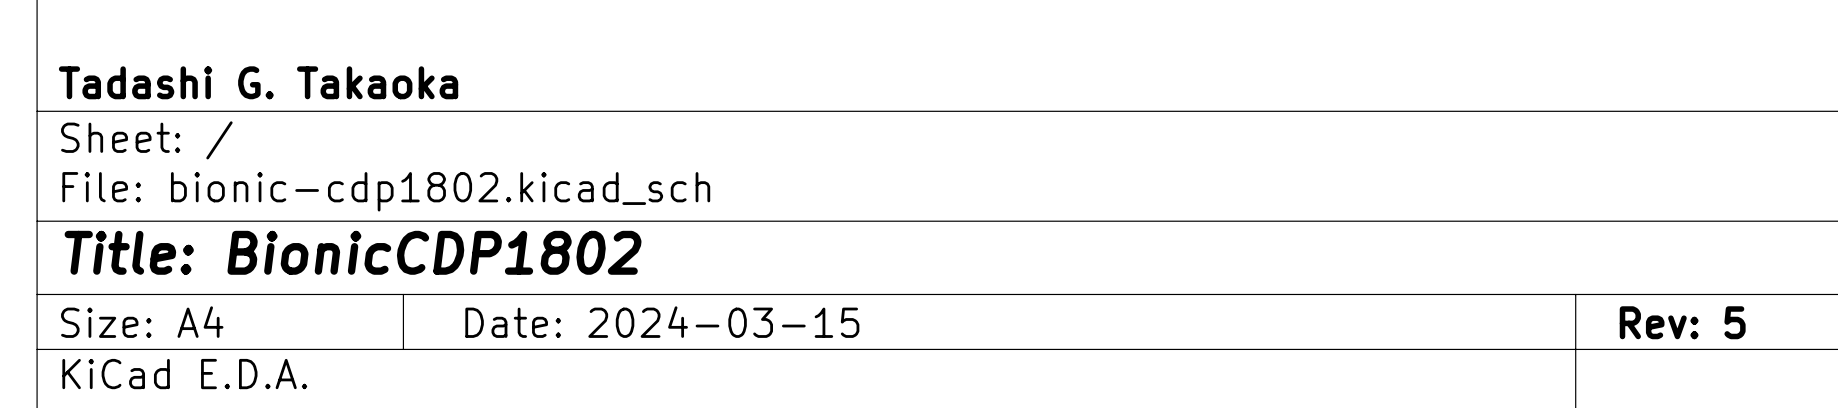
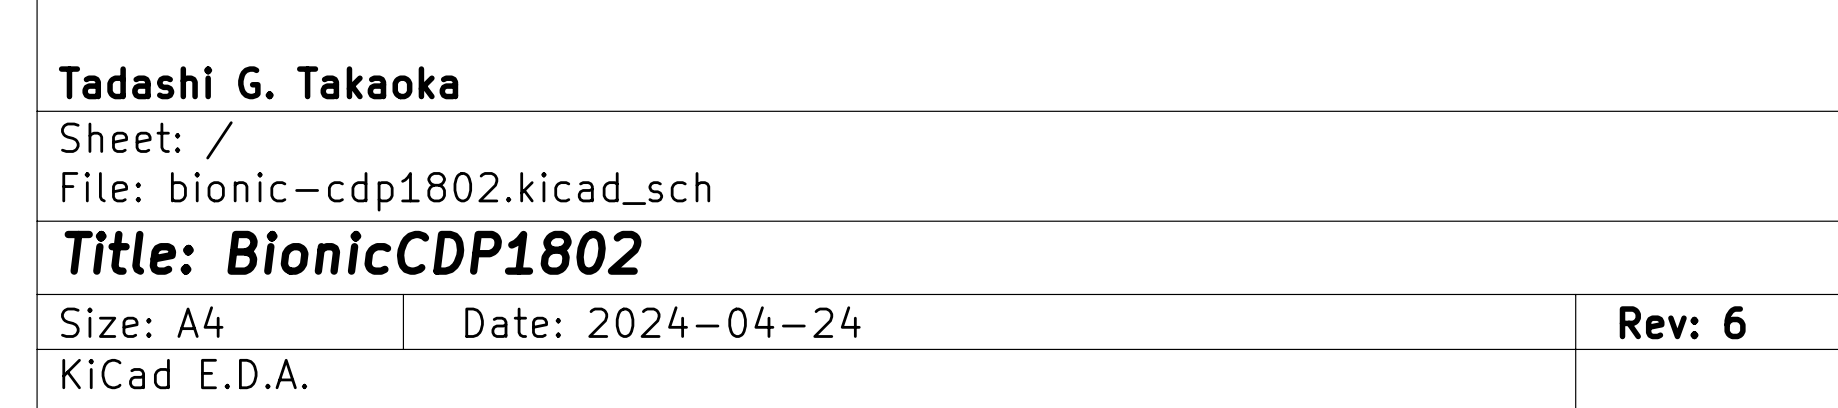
title block: Date: 2024-03-15 (662, 322) -> Date: 2024-04-24 (663, 322)
title block: Rev: 5 (1682, 322) -> Rev: 6 (1682, 322)

